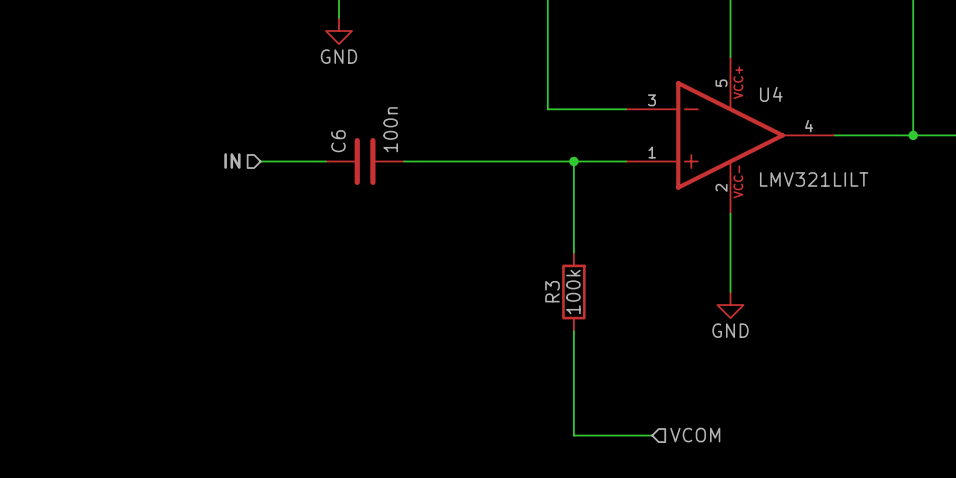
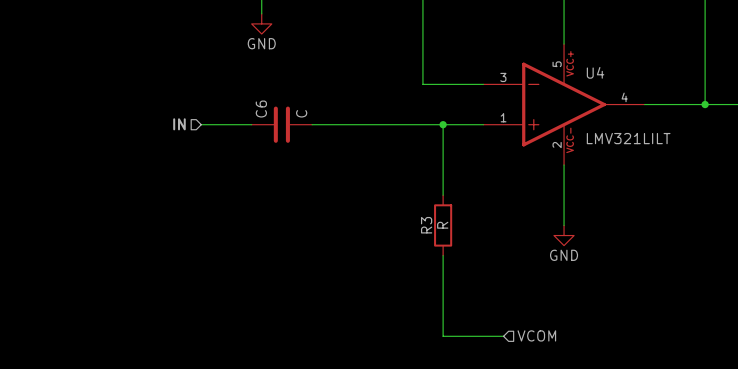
C6 value: 100n (390, 129) -> C (301, 113)
R3 value: 100k (573, 292) -> R (442, 225)

